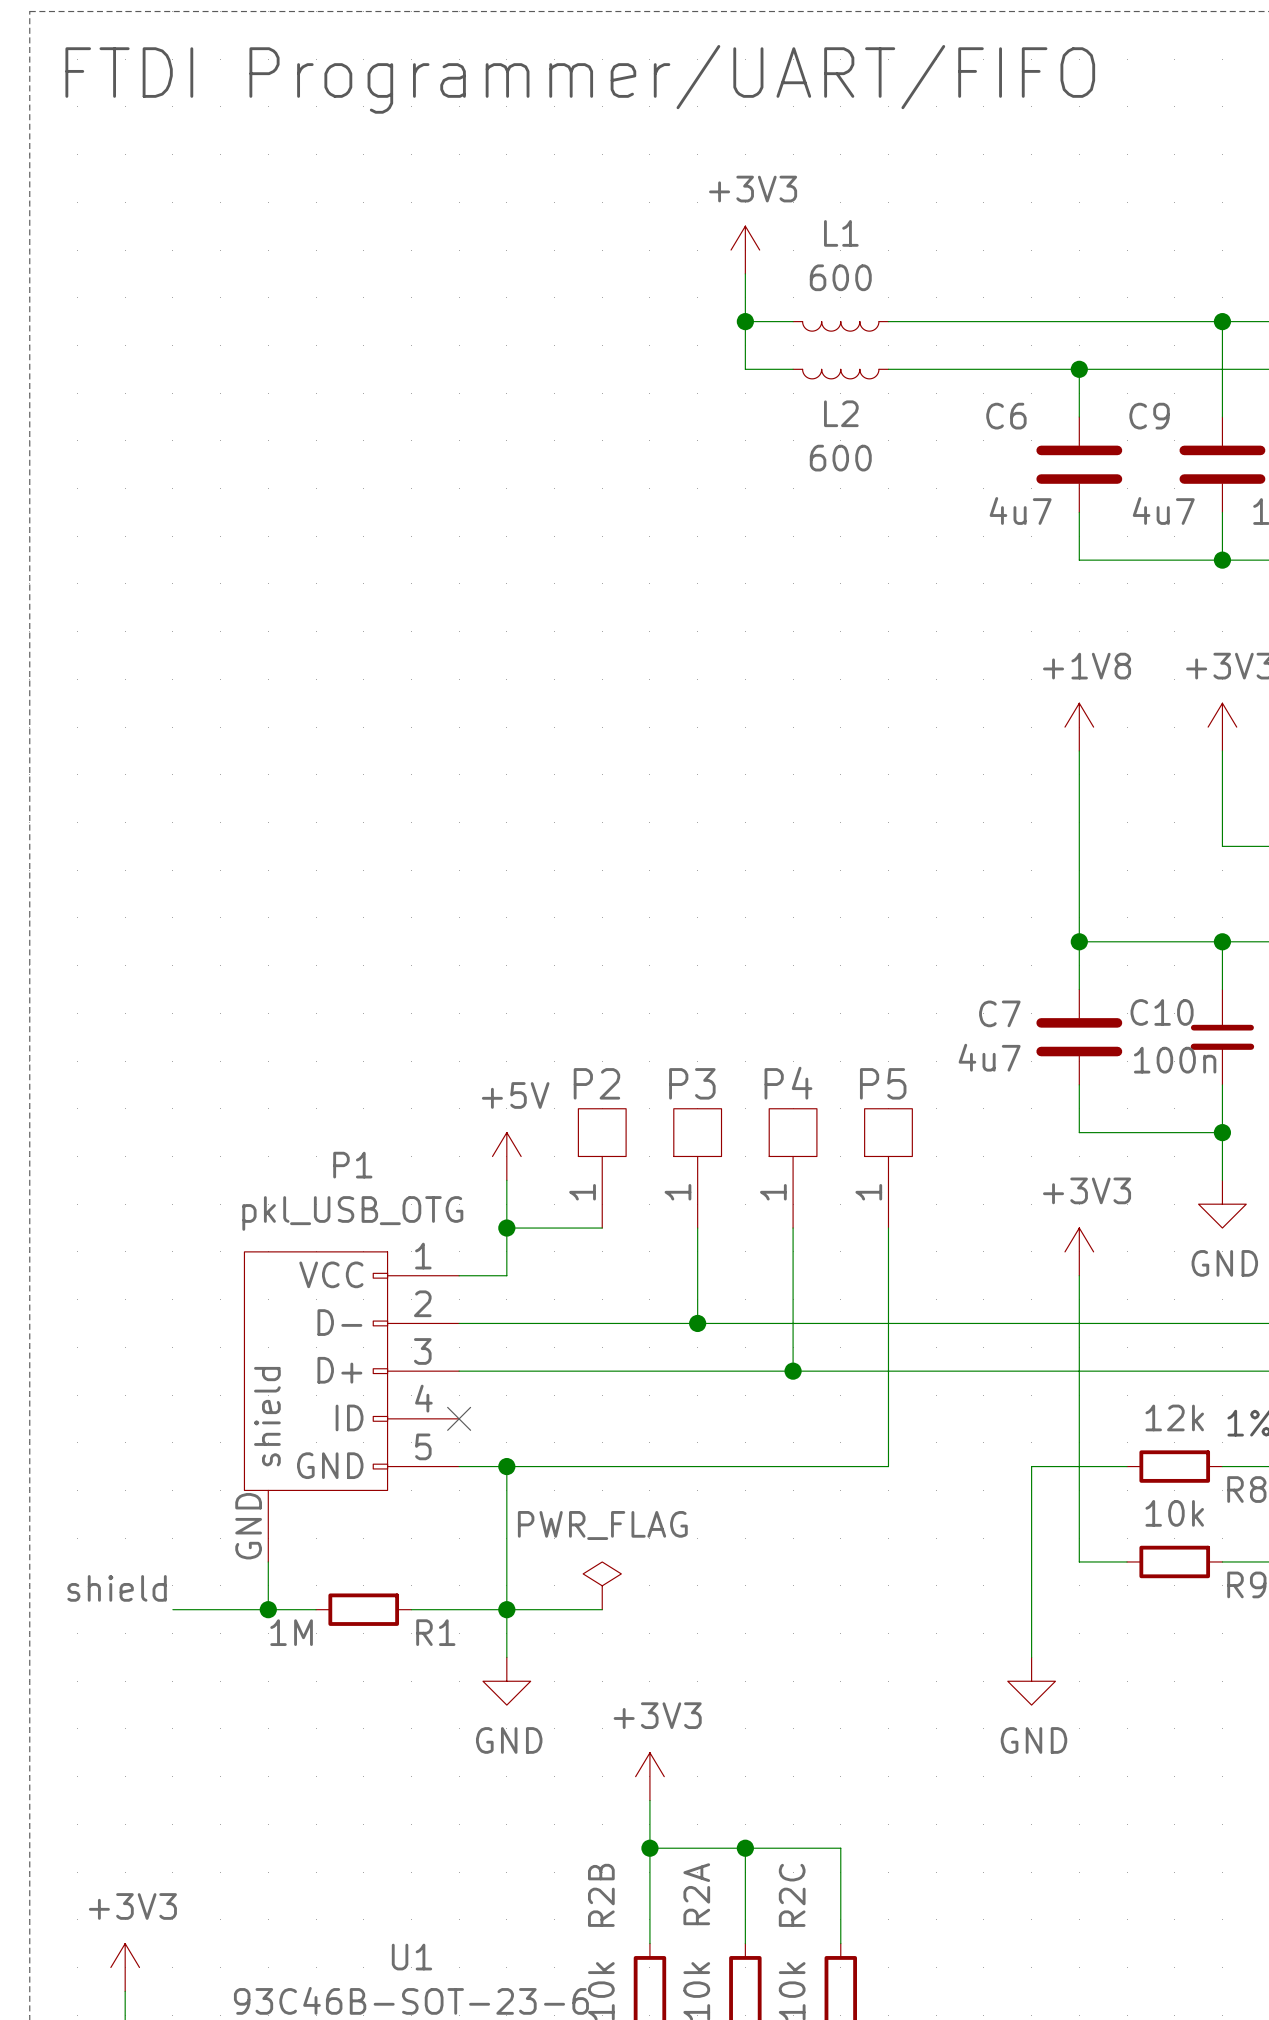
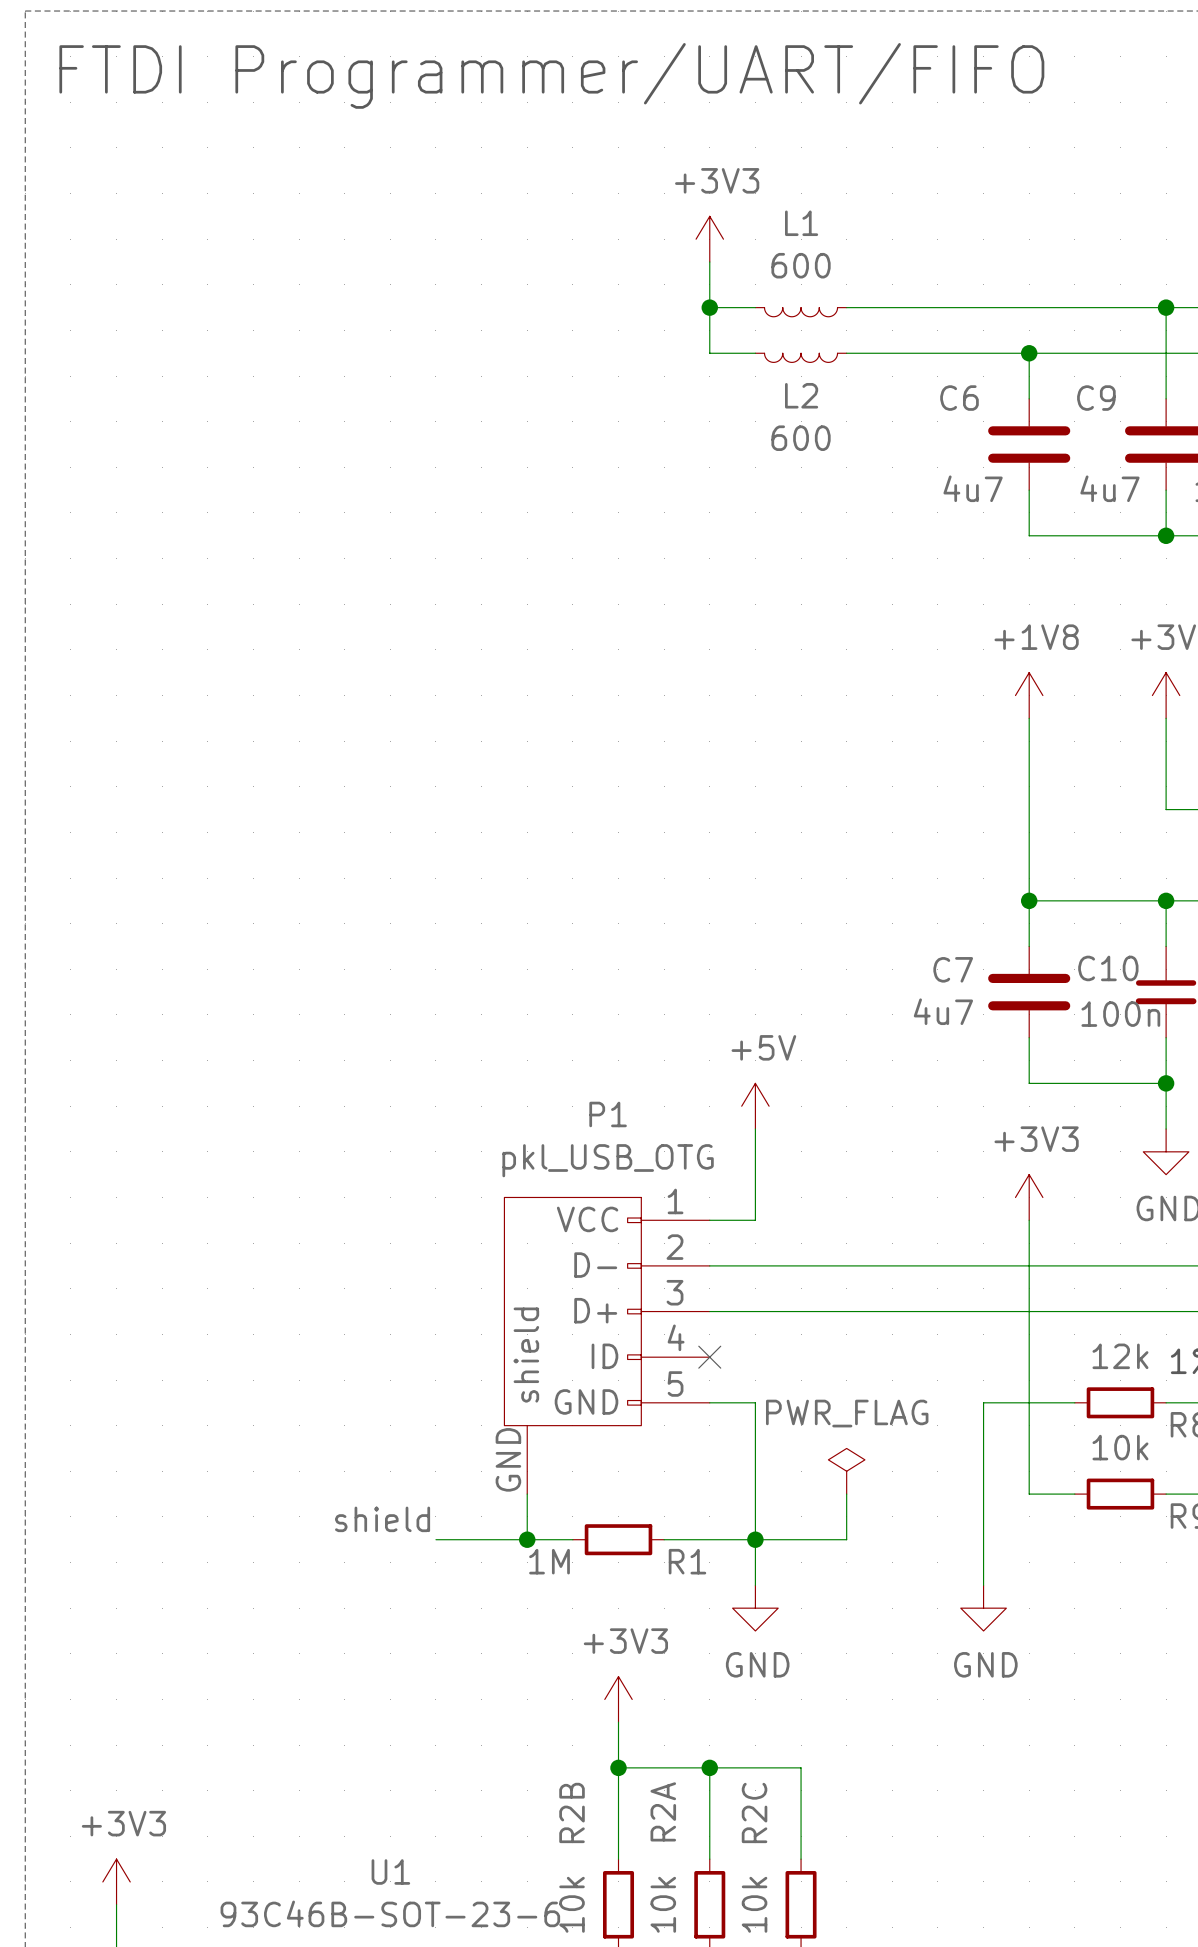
power symbol position: +5V (506, 1156) -> +5V (755, 1106)
P2: (602, 1168) -> none
P3: (697, 1168) -> none
P4: (793, 1168) -> none
P5: (888, 1168) -> none
wire: (506, 1180) (506, 1275) (459, 1275) -> none
wire: (506, 1228) (602, 1228) -> none
junction: (506, 1228) -> none
wire: (697, 1228) (697, 1323) -> none
wire: (888, 1228) (888, 1466) (793, 1466) -> (755, 1585) (755, 1402)
wire: (793, 1275) (793, 1371) -> (755, 1220) (709, 1220)
wire: (459, 1323) (745, 1323) -> none
junction: (697, 1323) -> none
wire: (459, 1371) (745, 1371) -> none
junction: (793, 1371) -> none
P1 position: (351, 1406) -> (607, 1345)
no-connect mark: (459, 1418) -> none
no-connect mark: none -> (709, 1357)
wire: (459, 1466) (745, 1466) -> none
wire: (506, 1466) (506, 1657) -> none
junction: (506, 1466) -> none
wire: (268, 1561) (268, 1609) -> (527, 1494) (527, 1539)
wire: none -> (846, 1494) (846, 1539) (664, 1539)
power symbol position: PWR_FLAG (602, 1585) -> PWR_FLAG (846, 1471)
label position: shield (117, 1588) -> shield (382, 1519)
wire: (172, 1609) (316, 1609) -> none
junction: (268, 1609) -> none
R1 position: (363, 1609) -> (618, 1539)
wire: (411, 1609) (459, 1609) -> none
junction position: (506, 1609) -> (527, 1539)
junction: none -> (755, 1539)
power symbol position: GND (506, 1681) -> GND (755, 1608)

